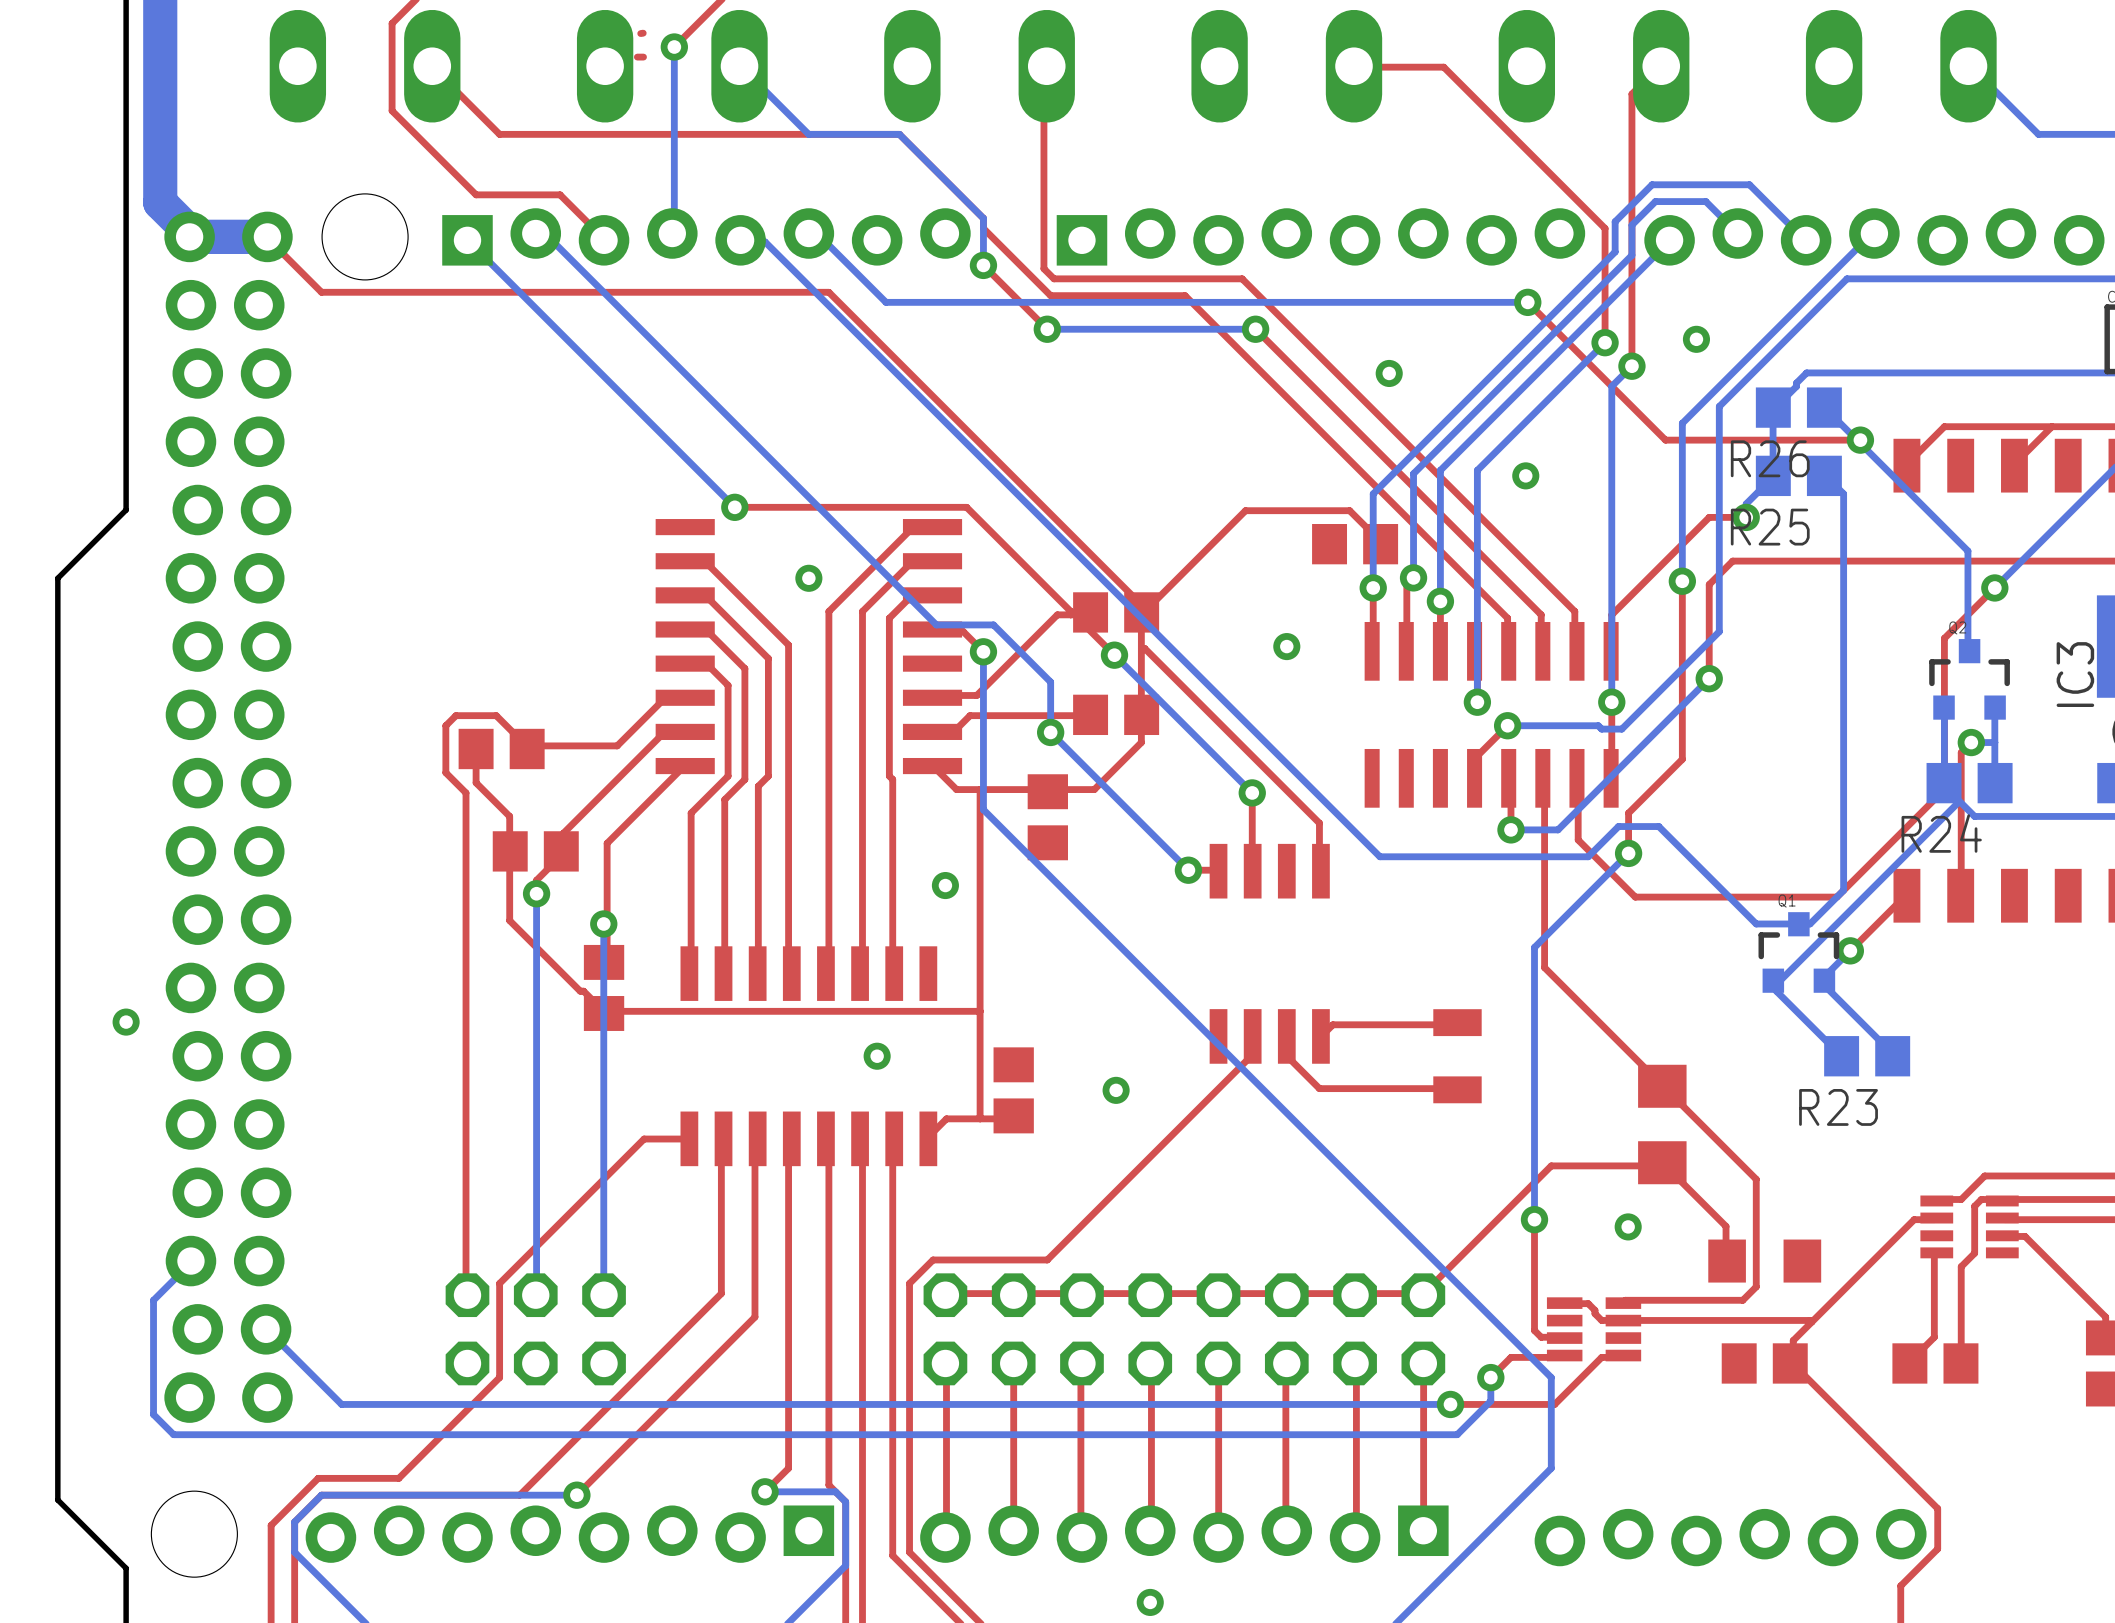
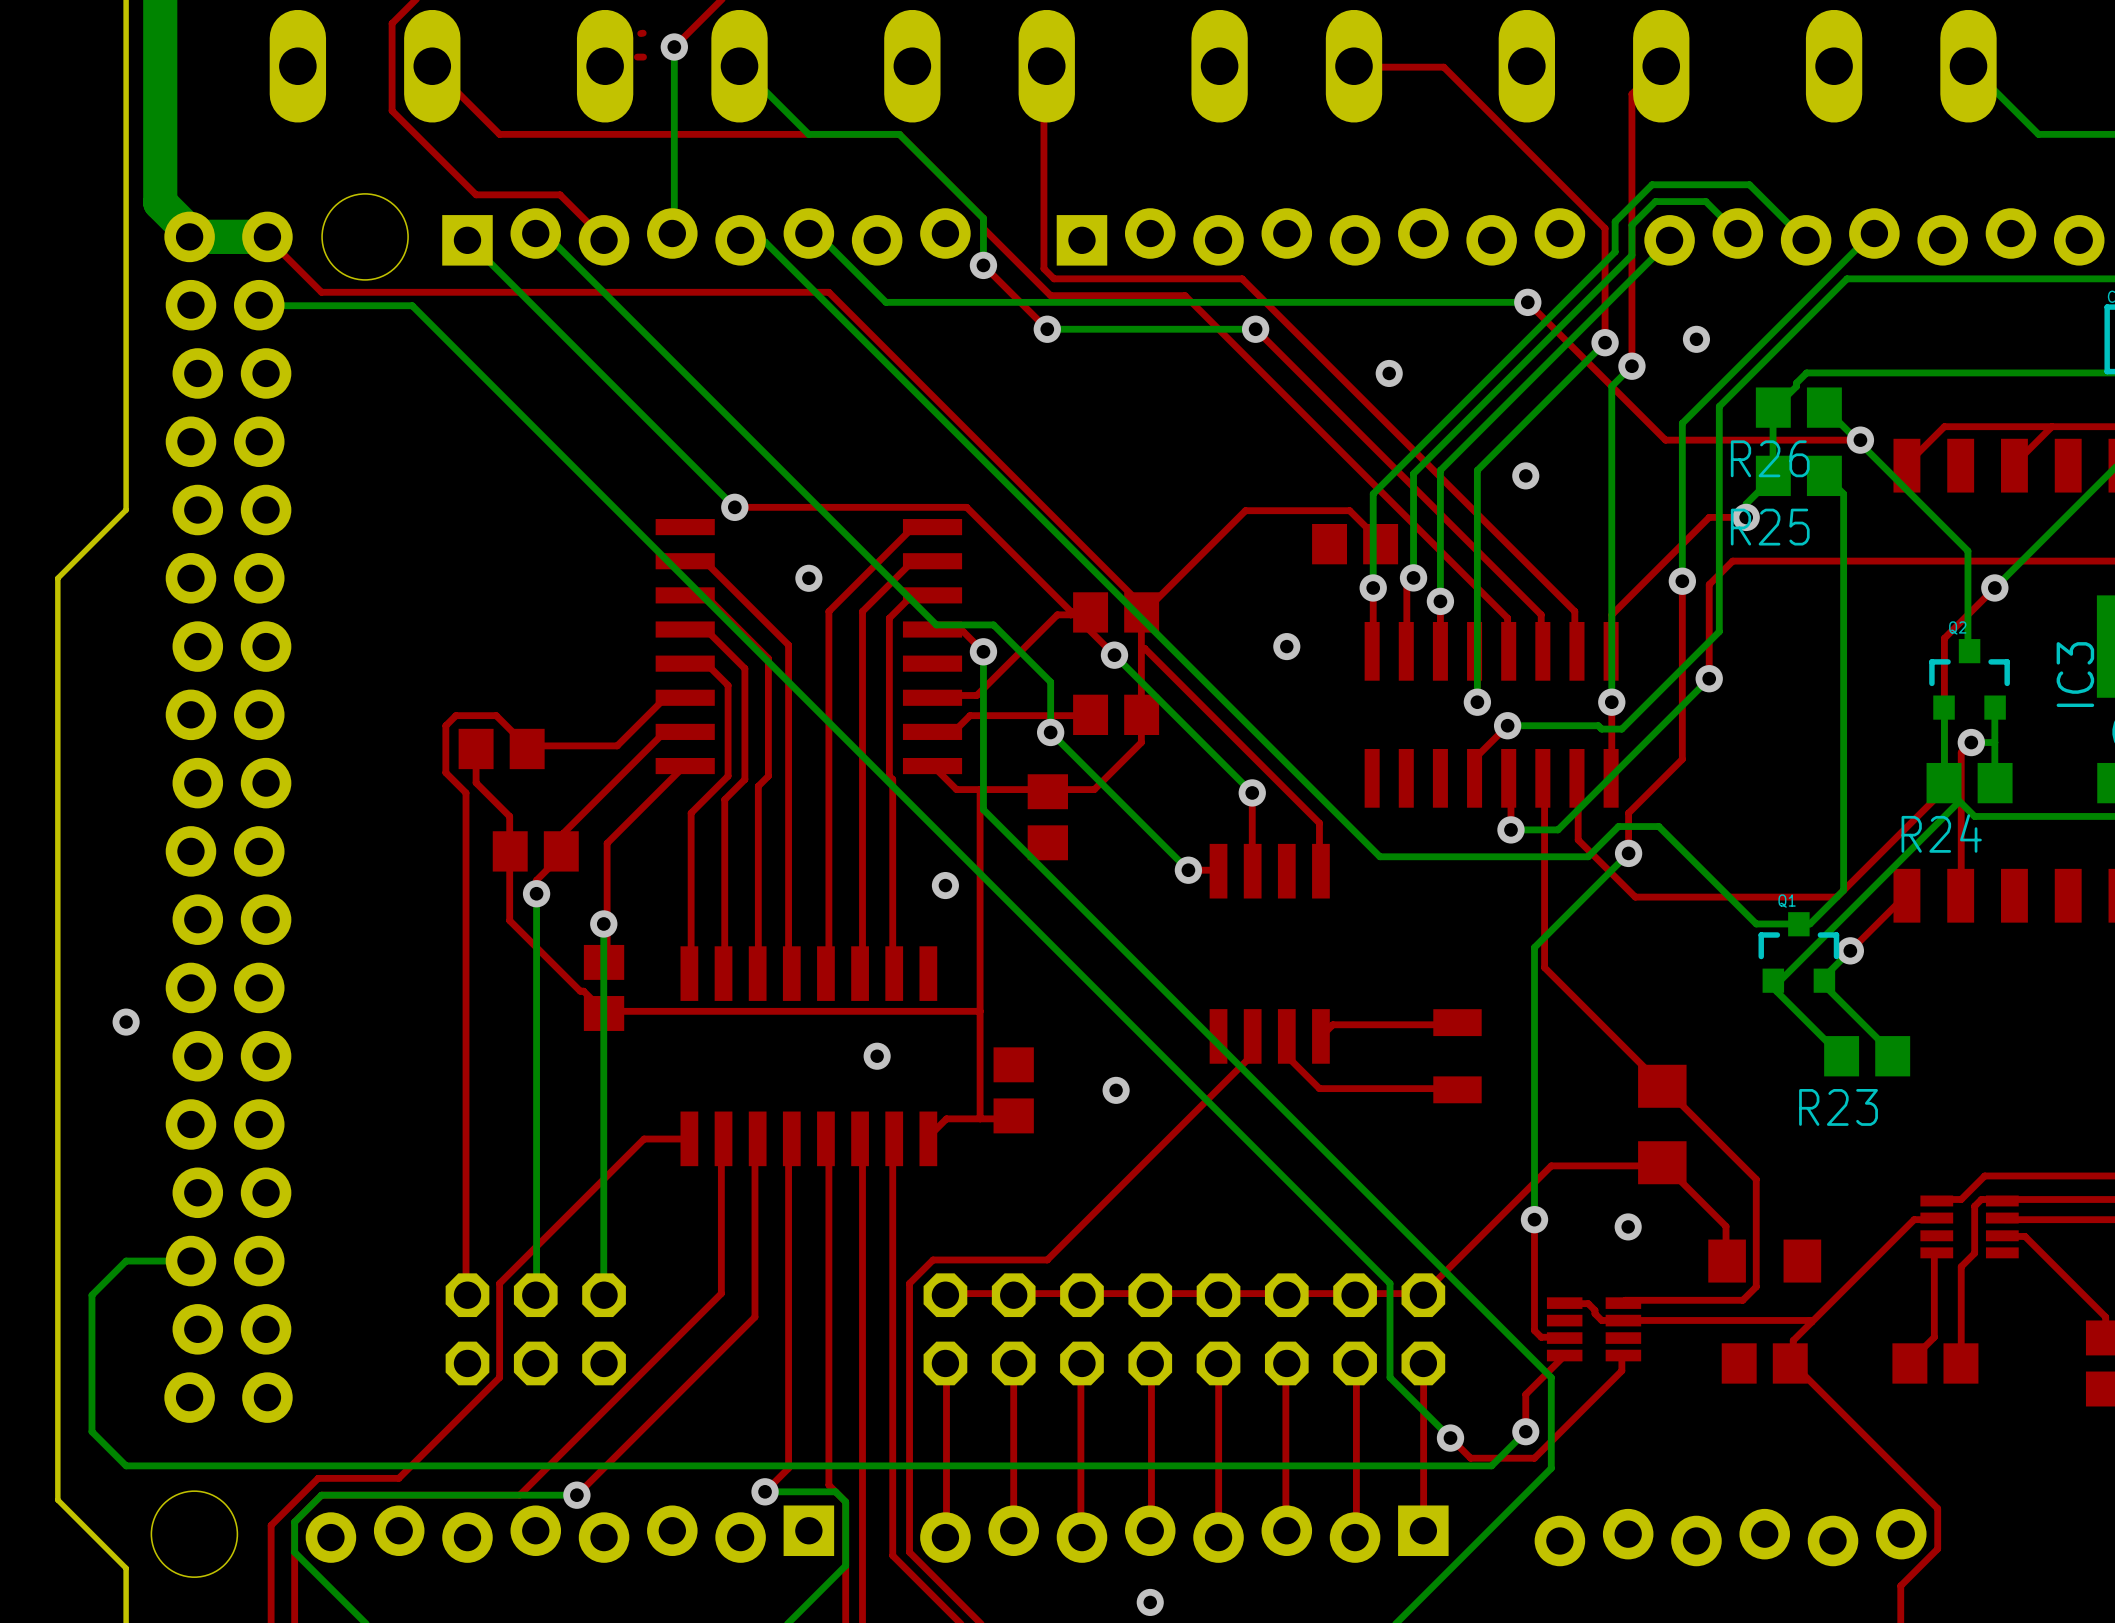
bottom track: none -> (259, 305) (412, 305) (1390, 1283) (1390, 1377) (1450, 1438)
bottom track: (190, 1261) (153, 1300) (153, 1414) (173, 1434) (1457, 1434) (1490, 1401) (1490, 1377) -> (190, 1261) (126, 1261) (91, 1295) (91, 1431) (126, 1465) (1491, 1465) (1525, 1431)
bottom track: (266, 1329) (341, 1404) (1450, 1404) -> none
top track: (1564, 1355) (1561, 1357) (1510, 1357) (1490, 1377) -> (1564, 1355) (1525, 1394) (1525, 1431)
top track: (1621, 1357) (1601, 1357) (1554, 1404) (1450, 1404) -> (1621, 1357) (1621, 1370) (1534, 1458) (1470, 1458) (1450, 1438)
via: (1490, 1377) -> none
via position: (1450, 1404) -> (1450, 1438)
via: none -> (1525, 1431)

